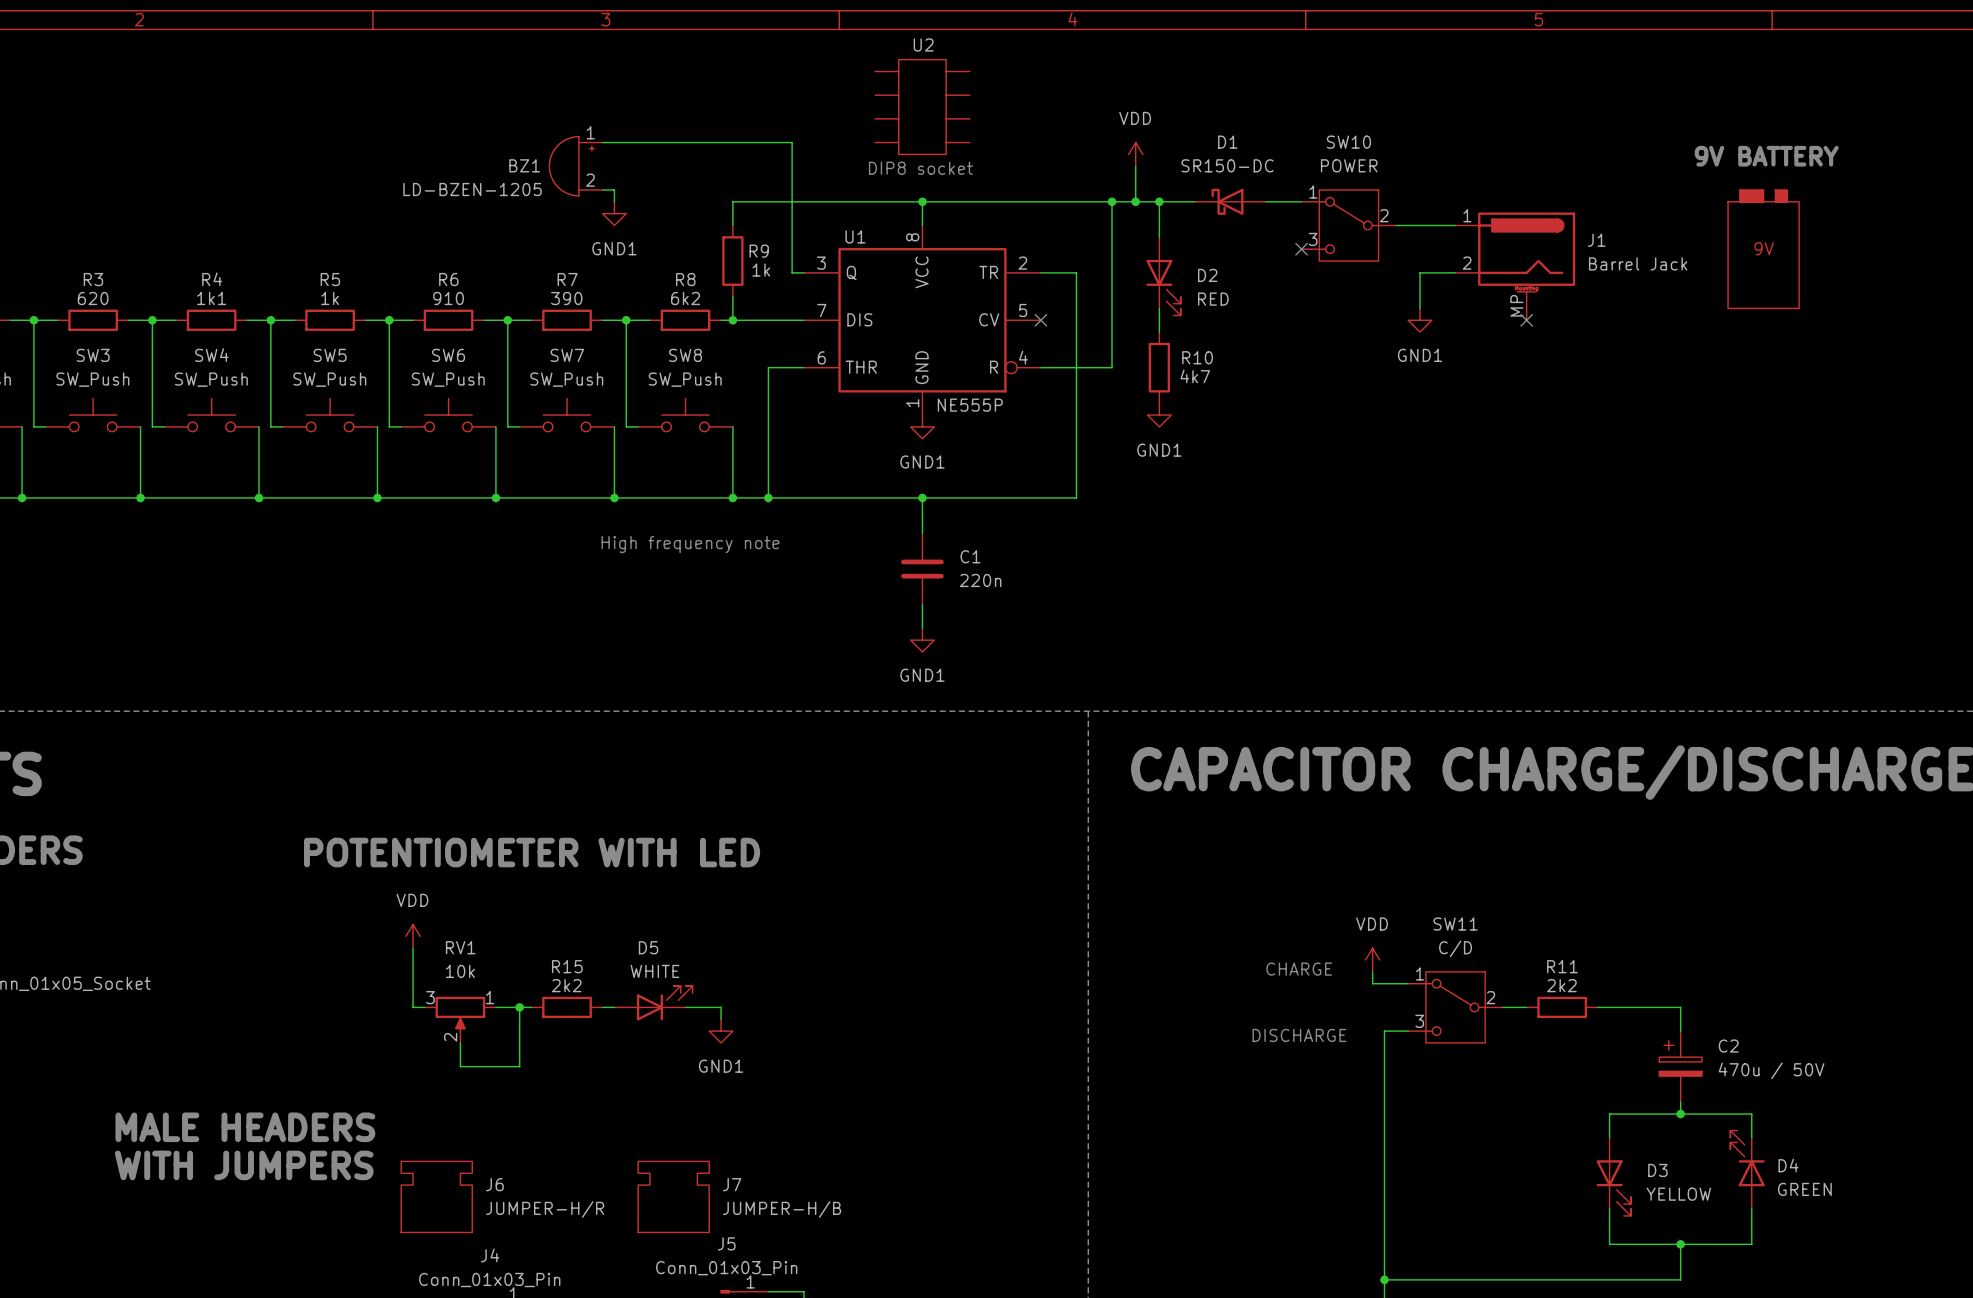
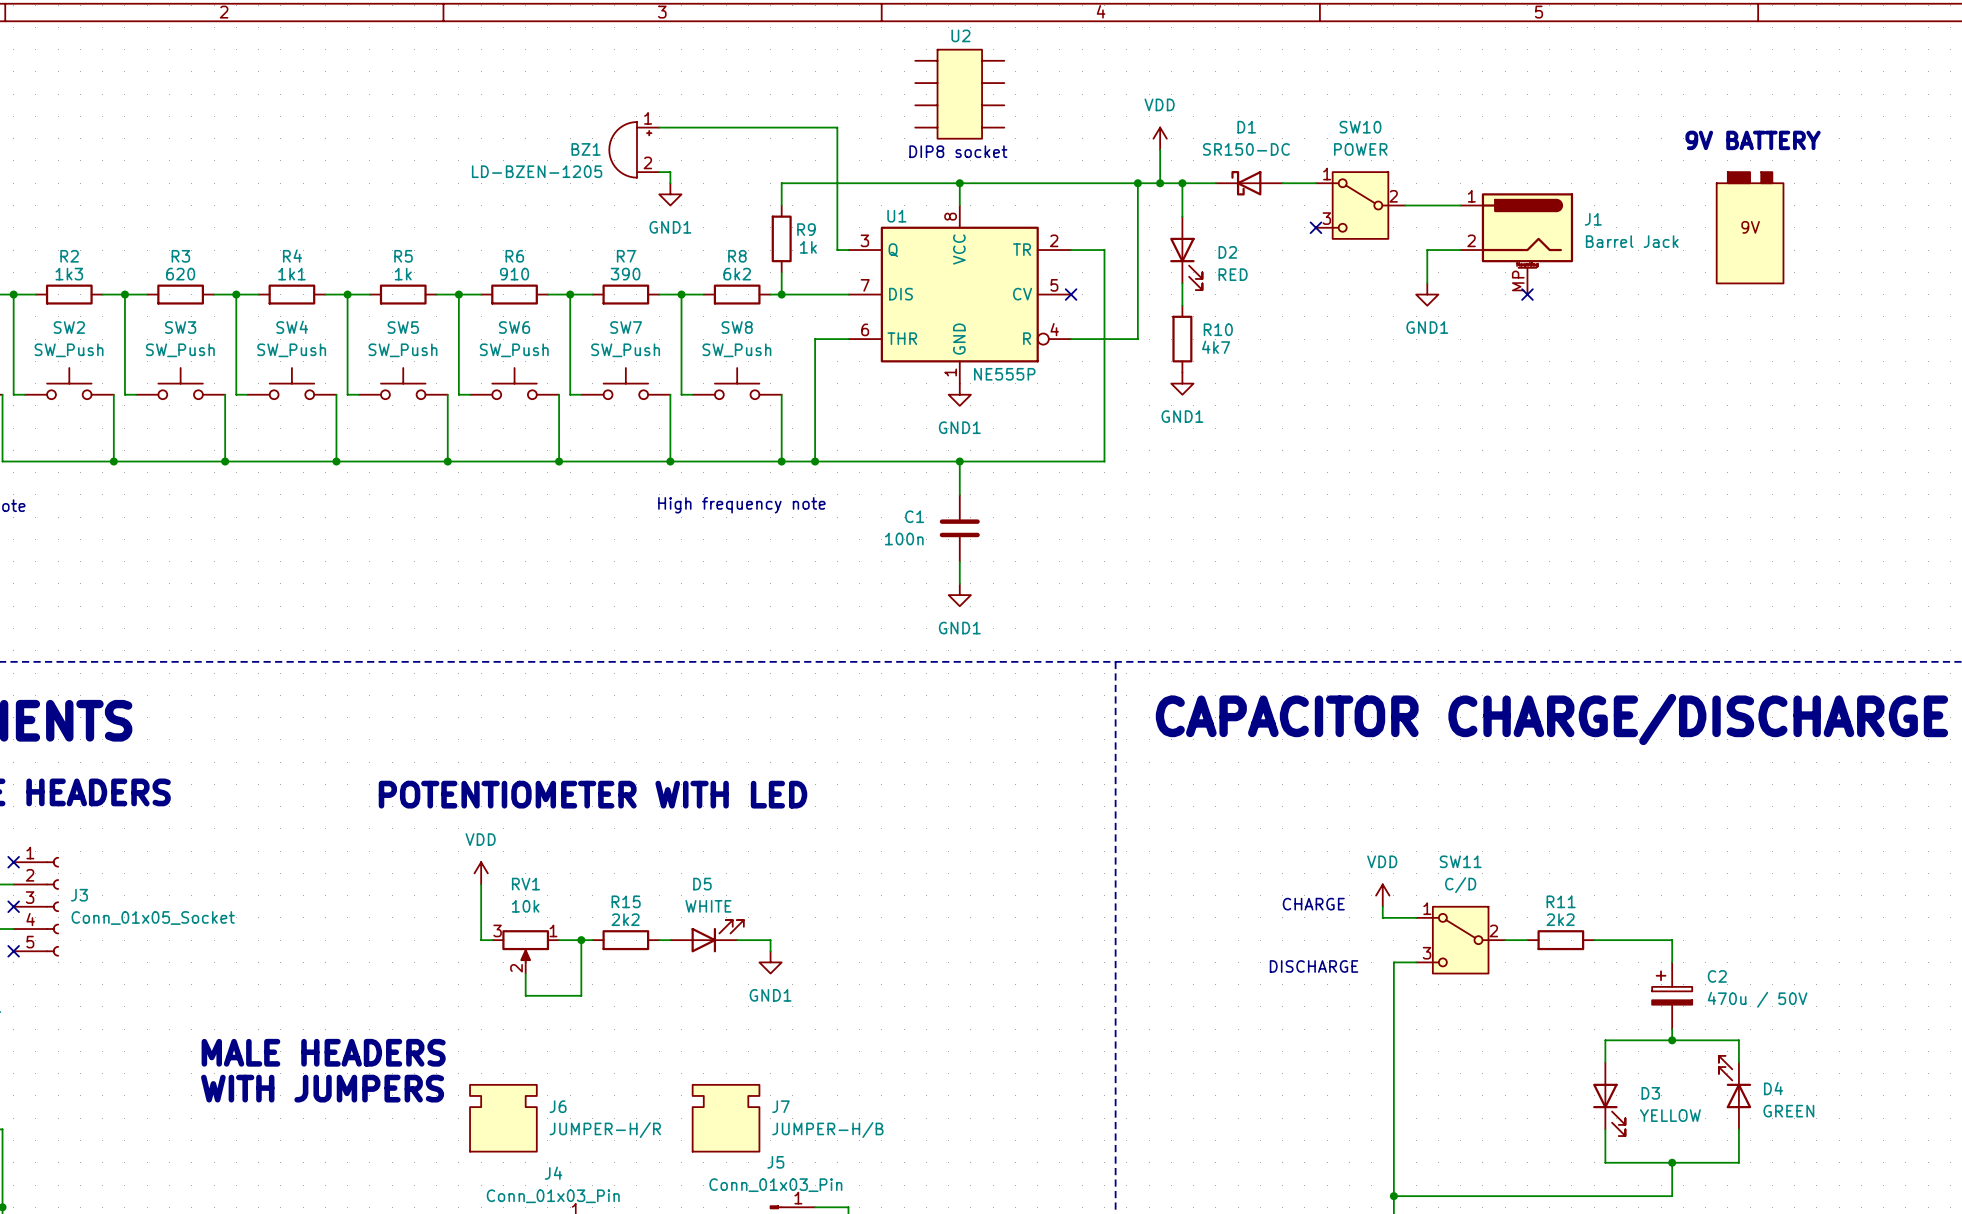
C1 name position: C1 (970, 556) -> C1 (914, 516)
C1 value: 220n (980, 580) -> 100n (904, 539)

